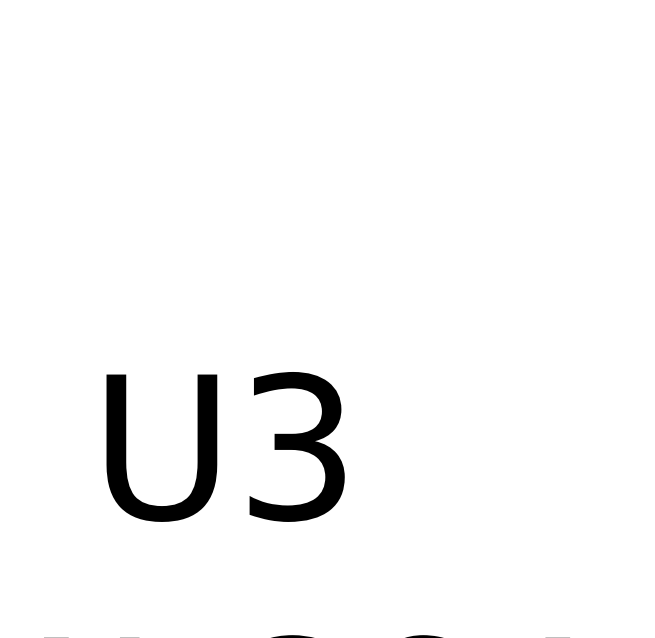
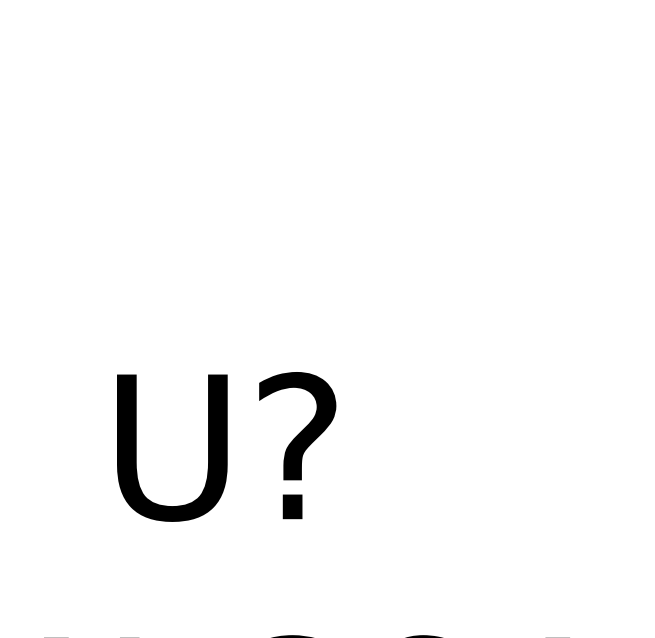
U3 name: U3 (225, 446) -> U? (226, 446)

